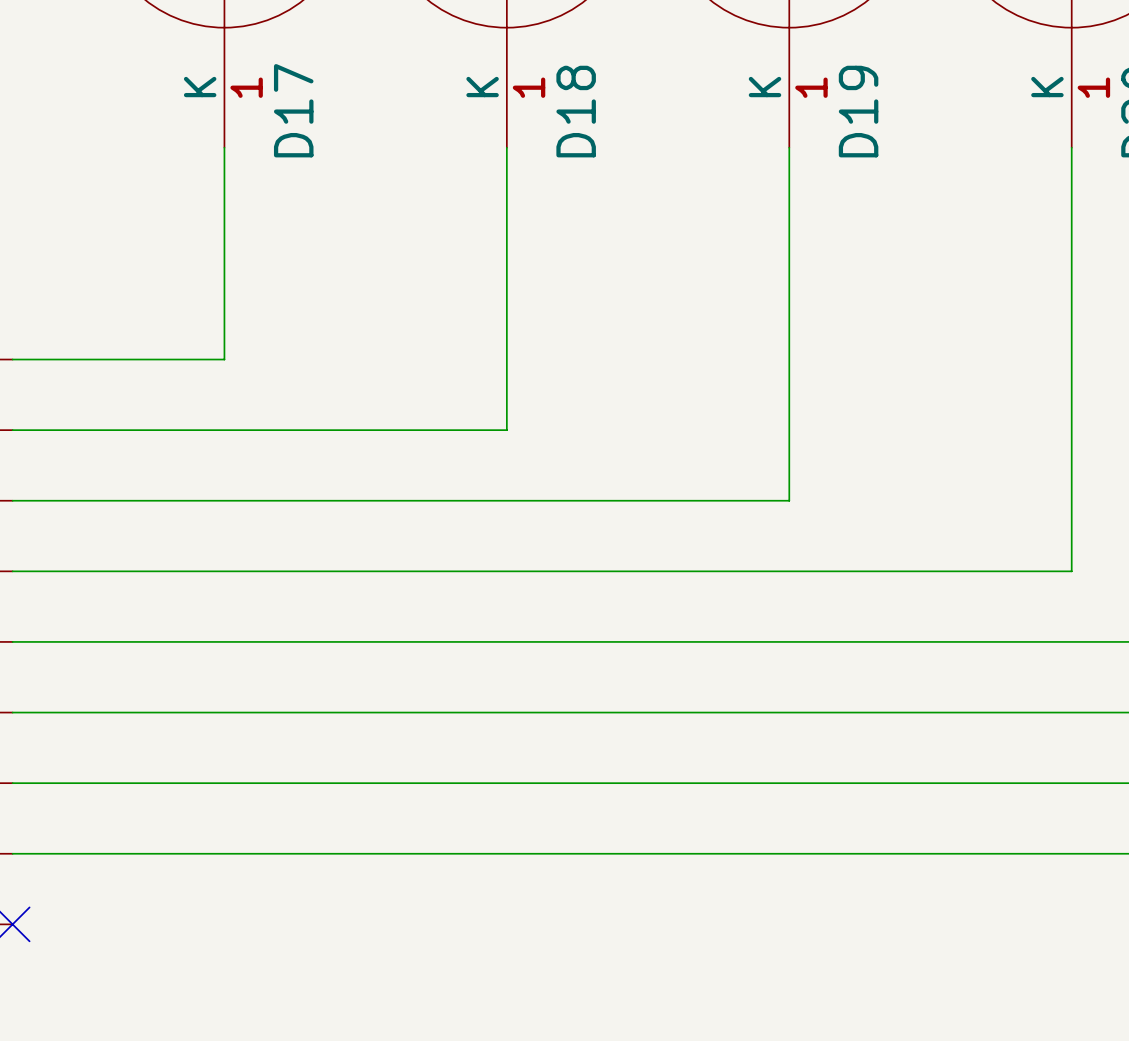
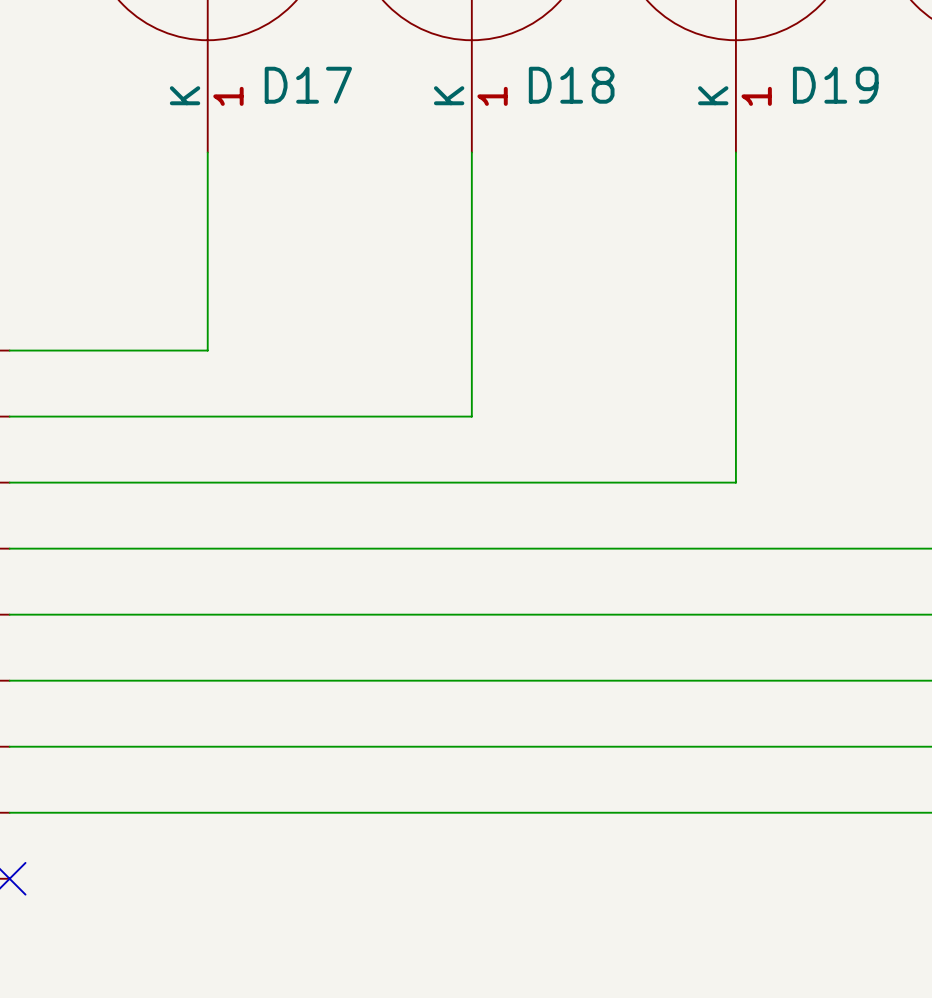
D17 name rotation: 0° (293, 110) -> 90° clockwise (308, 85)
D18 name rotation: 0° (576, 111) -> 90° clockwise (571, 85)
D19 name rotation: 0° (858, 111) -> 90° clockwise (835, 85)

